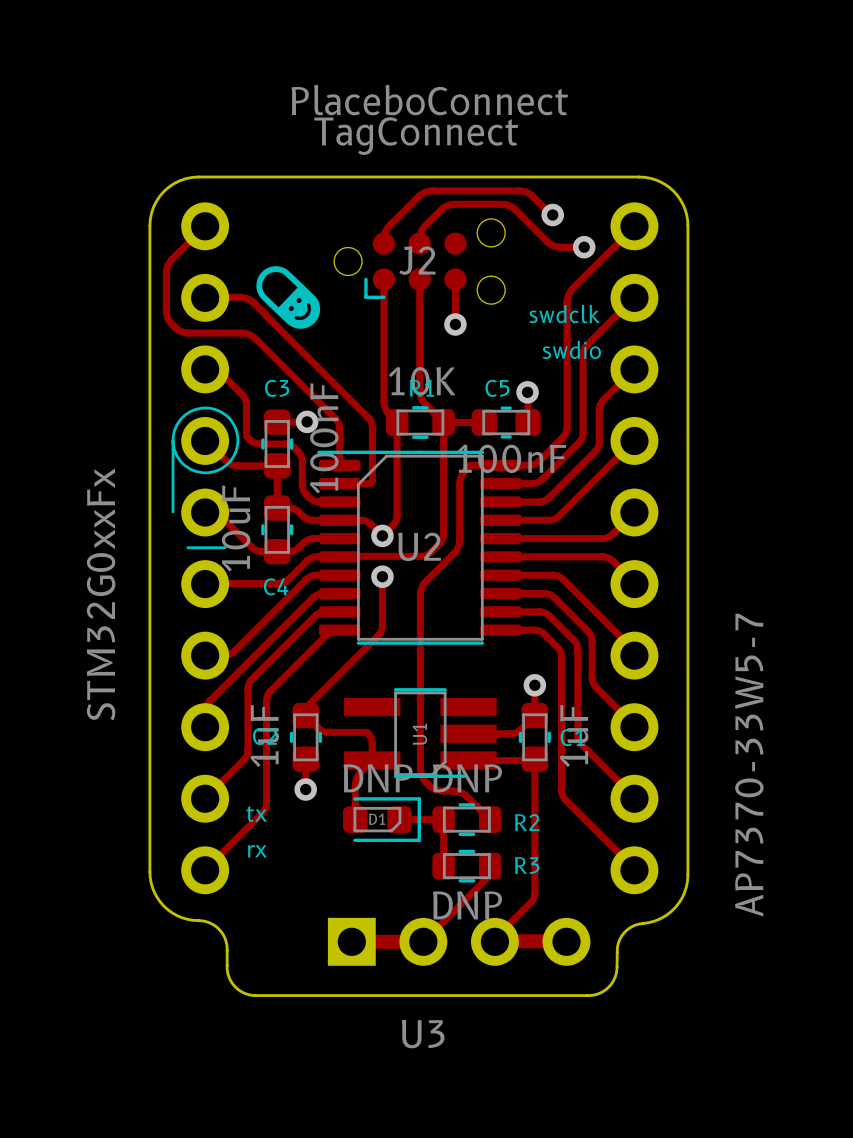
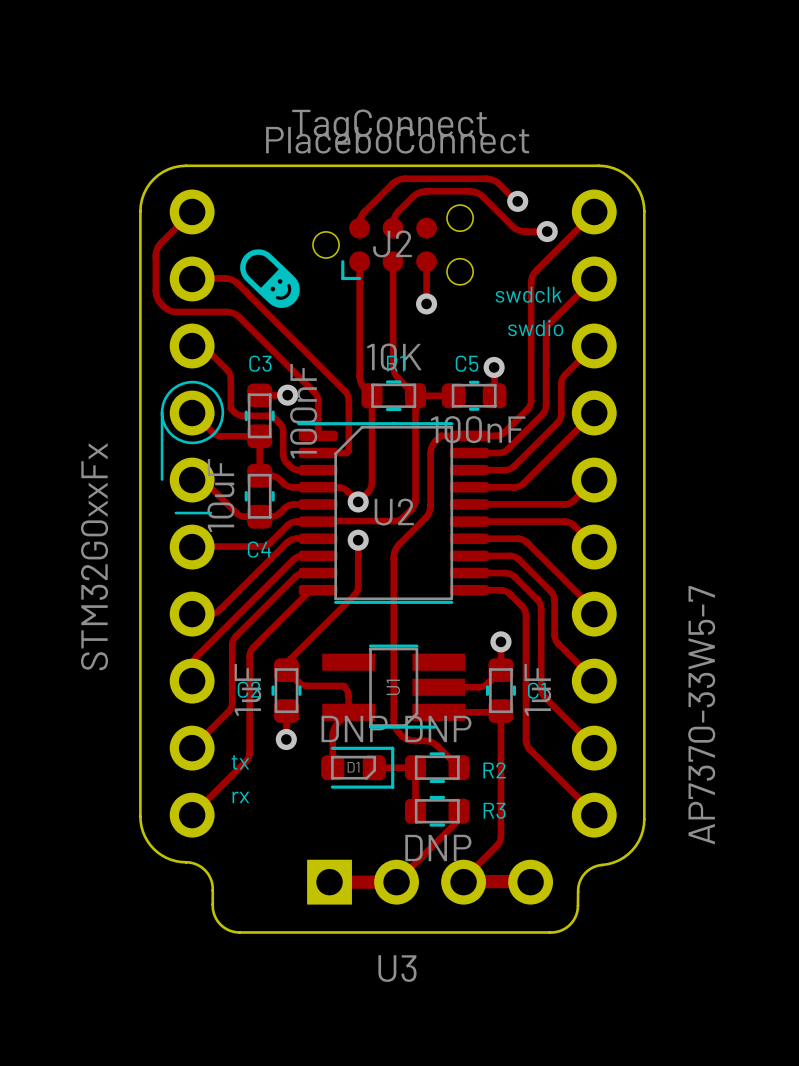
U3 value position: PlaceboConnect (429, 100) -> PlaceboConnect (397, 140)

